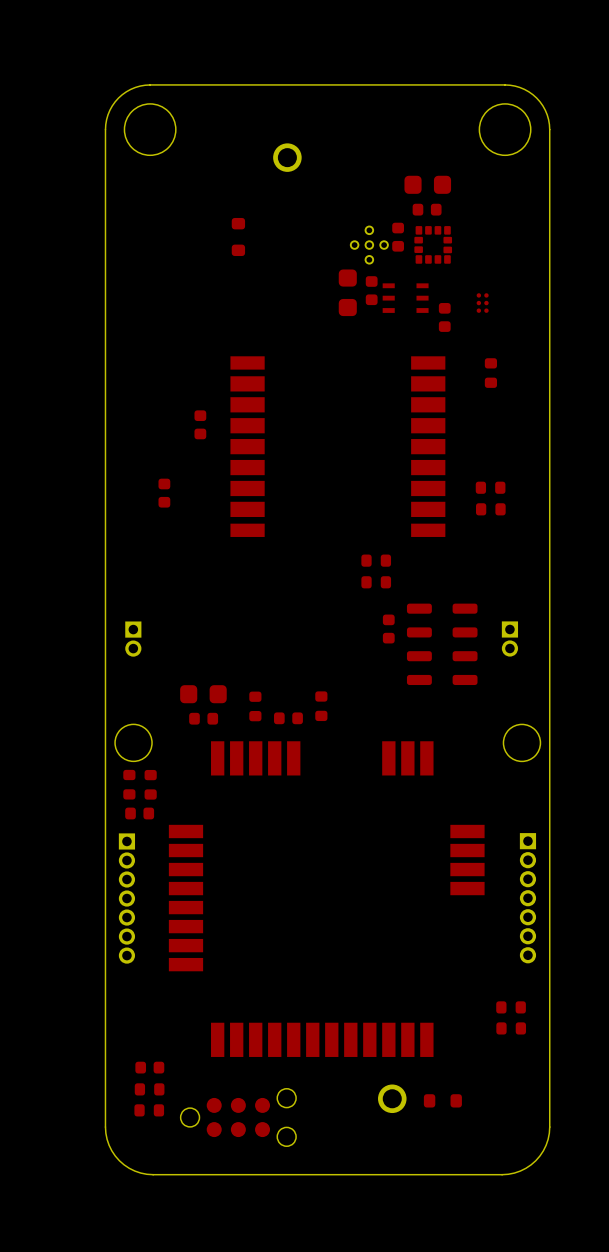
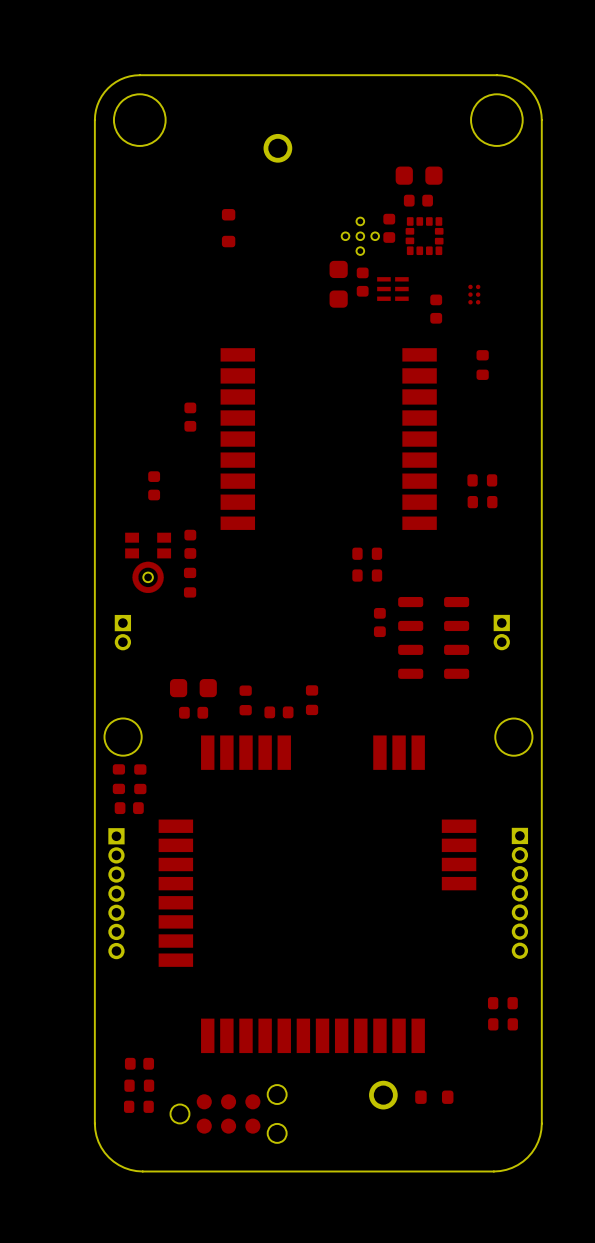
part footprint: [382, 283, 429, 313] -> [377, 277, 409, 301]
part: none -> (190, 544)
part: none -> (148, 562)
part: none -> (190, 582)

